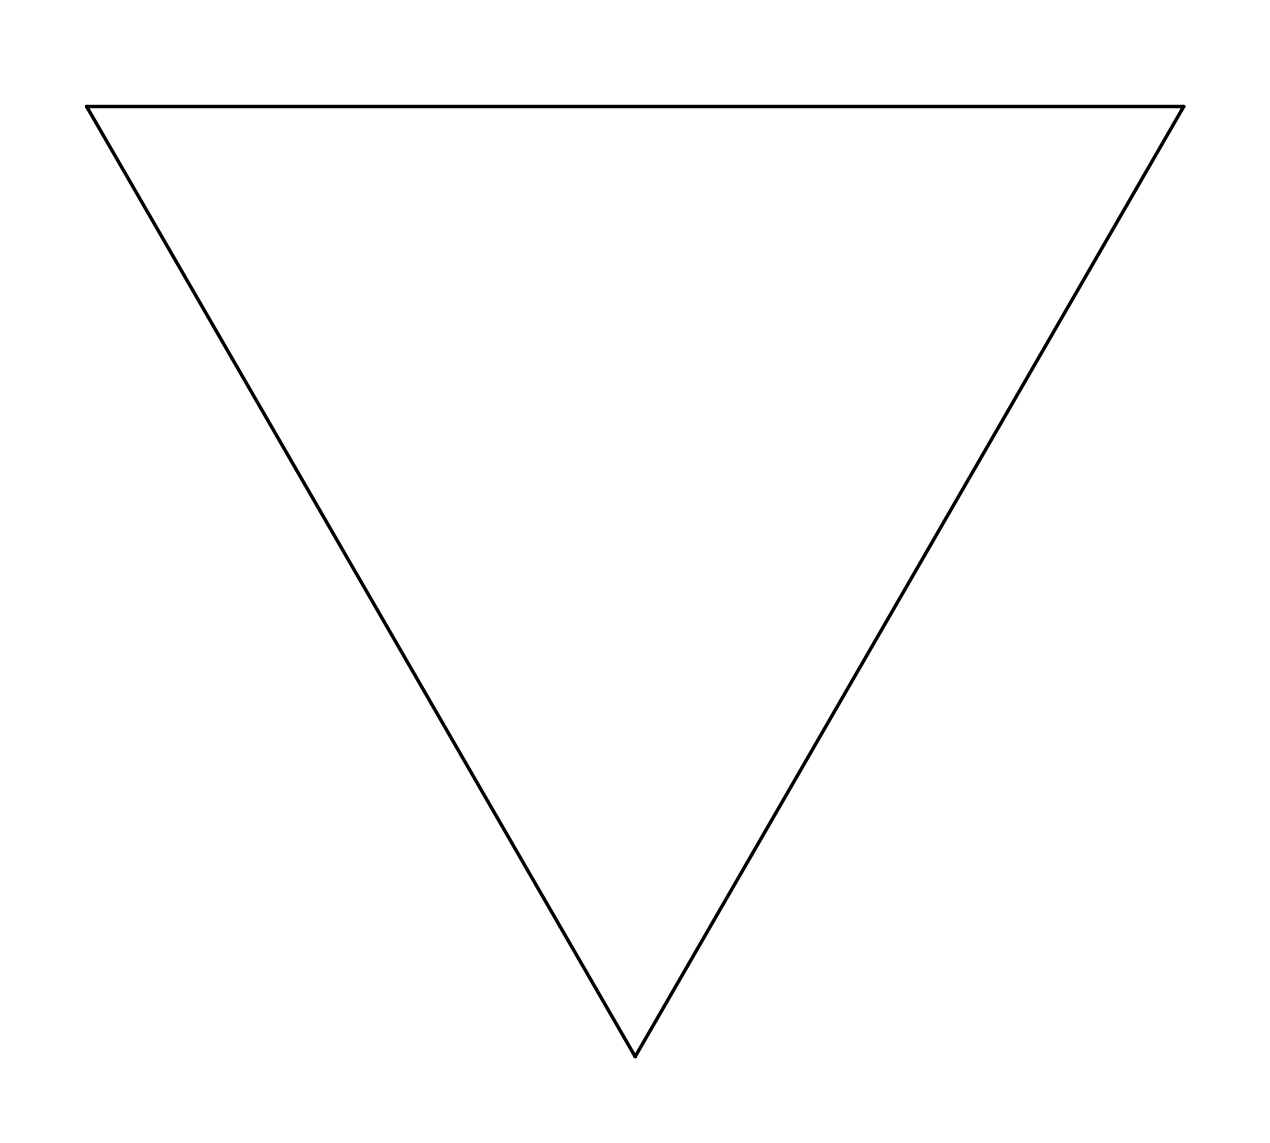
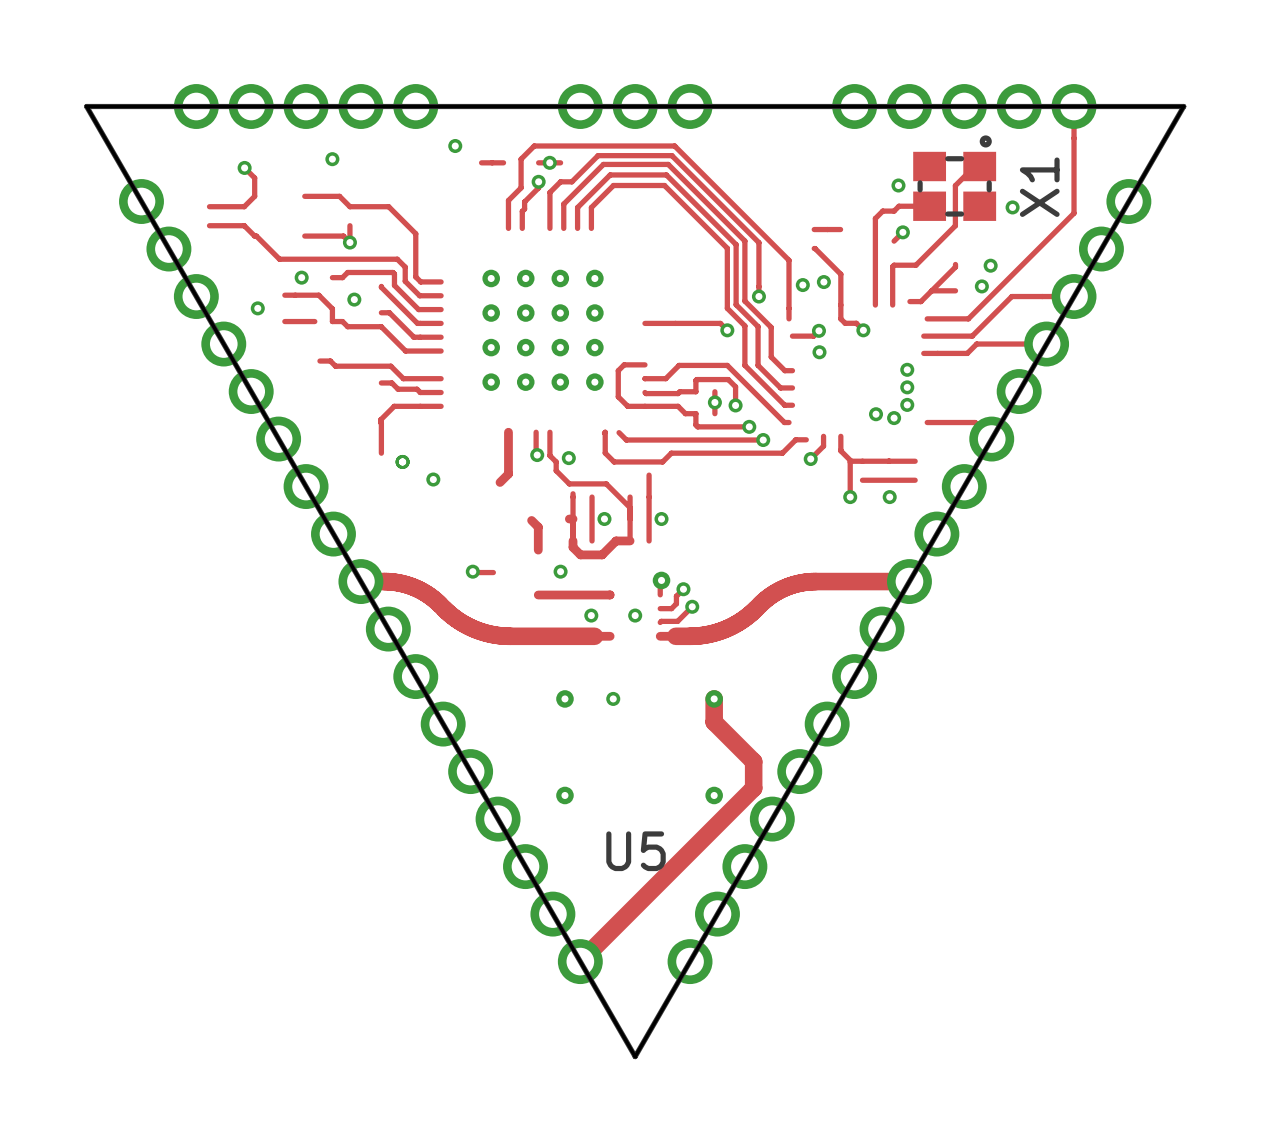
track: none -> (1074, 106) (1074, 213) (968, 318) (927, 318)
via: none -> (455, 146)
via: none -> (332, 159)
track: none -> (481, 162) (503, 162)
track: none -> (538, 162) (560, 162)
via: none -> (549, 162)
track: none -> (979, 166) (974, 166) (955, 185) (955, 225) (915, 265) (892, 266) (892, 305)
track: none -> (244, 167) (254, 178) (254, 196) (244, 206) (209, 206)
via: none -> (244, 167)
X1: none -> (954, 178)
track: none -> (538, 181) (538, 187) (524, 201) (522, 228)
via: none -> (538, 181)
via: none -> (898, 185)
track: none -> (304, 196) (339, 196) (349, 206) (388, 206) (415, 233) (415, 276) (420, 281) (441, 281)
track: none -> (929, 206) (898, 206) (894, 211) (882, 211) (875, 218) (875, 305)
via: none -> (1012, 207)
track: none -> (209, 225) (244, 225) (279, 259) (397, 259) (405, 267) (405, 281) (419, 295) (441, 295)
track: none -> (349, 225) (349, 242) (343, 236) (304, 236)
track: none -> (508, 228) (508, 200) (521, 187) (521, 159) (534, 146) (674, 146) (789, 260) (789, 318)
track: none -> (549, 228) (549, 192) (560, 181) (571, 181) (598, 155) (671, 155) (758, 242) (758, 296)
track: none -> (563, 228) (563, 204) (603, 164) (668, 164) (744, 241) (744, 301) (771, 327) (771, 357) (784, 370) (792, 370)
track: none -> (577, 228) (577, 207) (610, 174) (666, 174) (736, 244) (736, 304) (758, 326) (758, 365) (780, 387) (792, 387)
track: none -> (591, 228) (591, 207) (613, 185) (664, 185) (727, 248) (727, 308) (744, 325) (744, 365) (784, 405) (792, 405)
track: none -> (814, 229) (840, 229)
track: none -> (902, 232) (894, 241)
via: none -> (902, 232)
via: none -> (349, 242)
track: none -> (814, 248) (840, 274) (840, 318) (845, 323) (856, 323) (863, 330)
track: none -> (955, 264) (955, 267) (921, 301) (909, 301)
via: none -> (990, 265)
via: none -> (301, 277)
track: none -> (332, 277) (342, 277) (347, 272) (392, 272) (394, 285) (418, 309) (441, 309)
via: none -> (491, 278)
via: none -> (525, 278)
via: none -> (560, 278)
via: none -> (594, 278)
via: none -> (823, 282)
via: none -> (802, 285)
track: none -> (381, 286) (417, 323) (441, 323)
via: none -> (981, 286)
track: none -> (931, 290) (955, 290)
track: none -> (284, 295) (318, 295) (332, 308) (332, 321) (342, 321) (347, 326) (381, 326) (405, 351) (441, 351)
via: none -> (758, 296)
track: none -> (1074, 296) (1011, 296) (972, 336) (923, 336)
via: none -> (354, 299)
via: none -> (257, 308)
track: none -> (381, 312) (389, 312) (413, 337) (441, 337)
via: none -> (491, 313)
via: none -> (525, 313)
via: none -> (560, 313)
via: none -> (594, 313)
track: none -> (284, 321) (314, 321)
track: none -> (644, 323) (720, 323) (727, 330)
via: none -> (727, 330)
track: none -> (818, 330) (813, 336) (792, 336)
via: none -> (818, 330)
via: none -> (863, 330)
track: none -> (1046, 344) (976, 344) (967, 353) (923, 353)
via: none -> (491, 347)
via: none -> (525, 347)
via: none -> (560, 347)
via: none -> (594, 347)
via: none -> (819, 352)
track: none -> (319, 361) (330, 361) (335, 366) (390, 366) (403, 378) (441, 378)
track: none -> (644, 364) (624, 364) (618, 370) (618, 396) (627, 406) (678, 406) (685, 413) (695, 413) (695, 425) (697, 426) (749, 426)
via: none -> (907, 369)
track: none -> (644, 378) (665, 378) (679, 365) (727, 365) (784, 422) (789, 422)
track: none -> (381, 382) (391, 382) (398, 389) (416, 389) (420, 392) (441, 392)
via: none -> (491, 382)
via: none -> (525, 382)
via: none -> (560, 382)
via: none -> (594, 382)
via: none -> (907, 387)
track: none -> (714, 391) (714, 413)
track: none -> (644, 392) (678, 393) (679, 391) (695, 391) (696, 379) (728, 379) (735, 386) (735, 405)
via: none -> (714, 402)
via: none -> (907, 404)
via: none -> (735, 405)
track: none -> (441, 406) (394, 406) (380, 419) (381, 453)
via: none -> (876, 414)
via: none -> (894, 418)
track: none -> (927, 422) (975, 422) (991, 439)
via: none -> (749, 426)
track: none -> (508, 432) (508, 474) (500, 482)
track: none -> (536, 432) (536, 455)
track: none -> (549, 432) (549, 455) (556, 461) (556, 470) (569, 483) (606, 483) (630, 507)
track: none -> (619, 432) (626, 440) (763, 440)
track: none -> (604, 433) (605, 453) (614, 461) (662, 461) (671, 453) (782, 453) (795, 439) (806, 439)
track: none -> (823, 436) (823, 446) (810, 459)
track: none -> (840, 436) (840, 450) (851, 461)
via: none -> (763, 440)
via: none -> (537, 455)
via: none -> (568, 458)
via: none -> (810, 459)
via: none -> (402, 461)
track: none -> (851, 461) (850, 497)
track: none -> (851, 461) (915, 461)
track: none -> (649, 475) (649, 540)
via: none -> (433, 479)
track: none -> (862, 480) (915, 480)
track: none -> (573, 493) (573, 547) (580, 554) (602, 554) (616, 540) (630, 540) (630, 497)
track: none -> (592, 497) (592, 540)
via: none -> (850, 497)
via: none -> (889, 497)
track: none -> (569, 519) (573, 519)
via: none -> (604, 519)
via: none -> (661, 519)
track: none -> (531, 520) (538, 527) (538, 550)
track: none -> (472, 571) (493, 572)
via: none -> (472, 571)
via: none -> (560, 571)
U5: none -> (635, 571)
track: none -> (661, 580) (660, 594)
via: none -> (661, 580)
track: none -> (360, 581) (393, 582) (414, 587) (431, 597) (460, 621) (489, 634) (507, 636) (610, 636)
track: none -> (909, 581) (813, 581) (798, 583) (773, 593) (743, 619) (723, 630) (699, 635) (660, 636)
track: none -> (683, 589) (676, 596) (676, 603) (671, 608) (660, 608)
via: none -> (683, 589)
track: none -> (538, 595) (609, 595)
track: none -> (692, 606) (677, 621) (660, 622)
via: none -> (692, 606)
via: none -> (591, 615)
via: none -> (635, 615)
via: none -> (564, 698)
via: none -> (613, 698)
track: none -> (714, 698) (714, 722) (753, 761) (753, 788) (580, 961)
via: none -> (714, 698)
via: none -> (564, 795)
via: none -> (714, 795)

